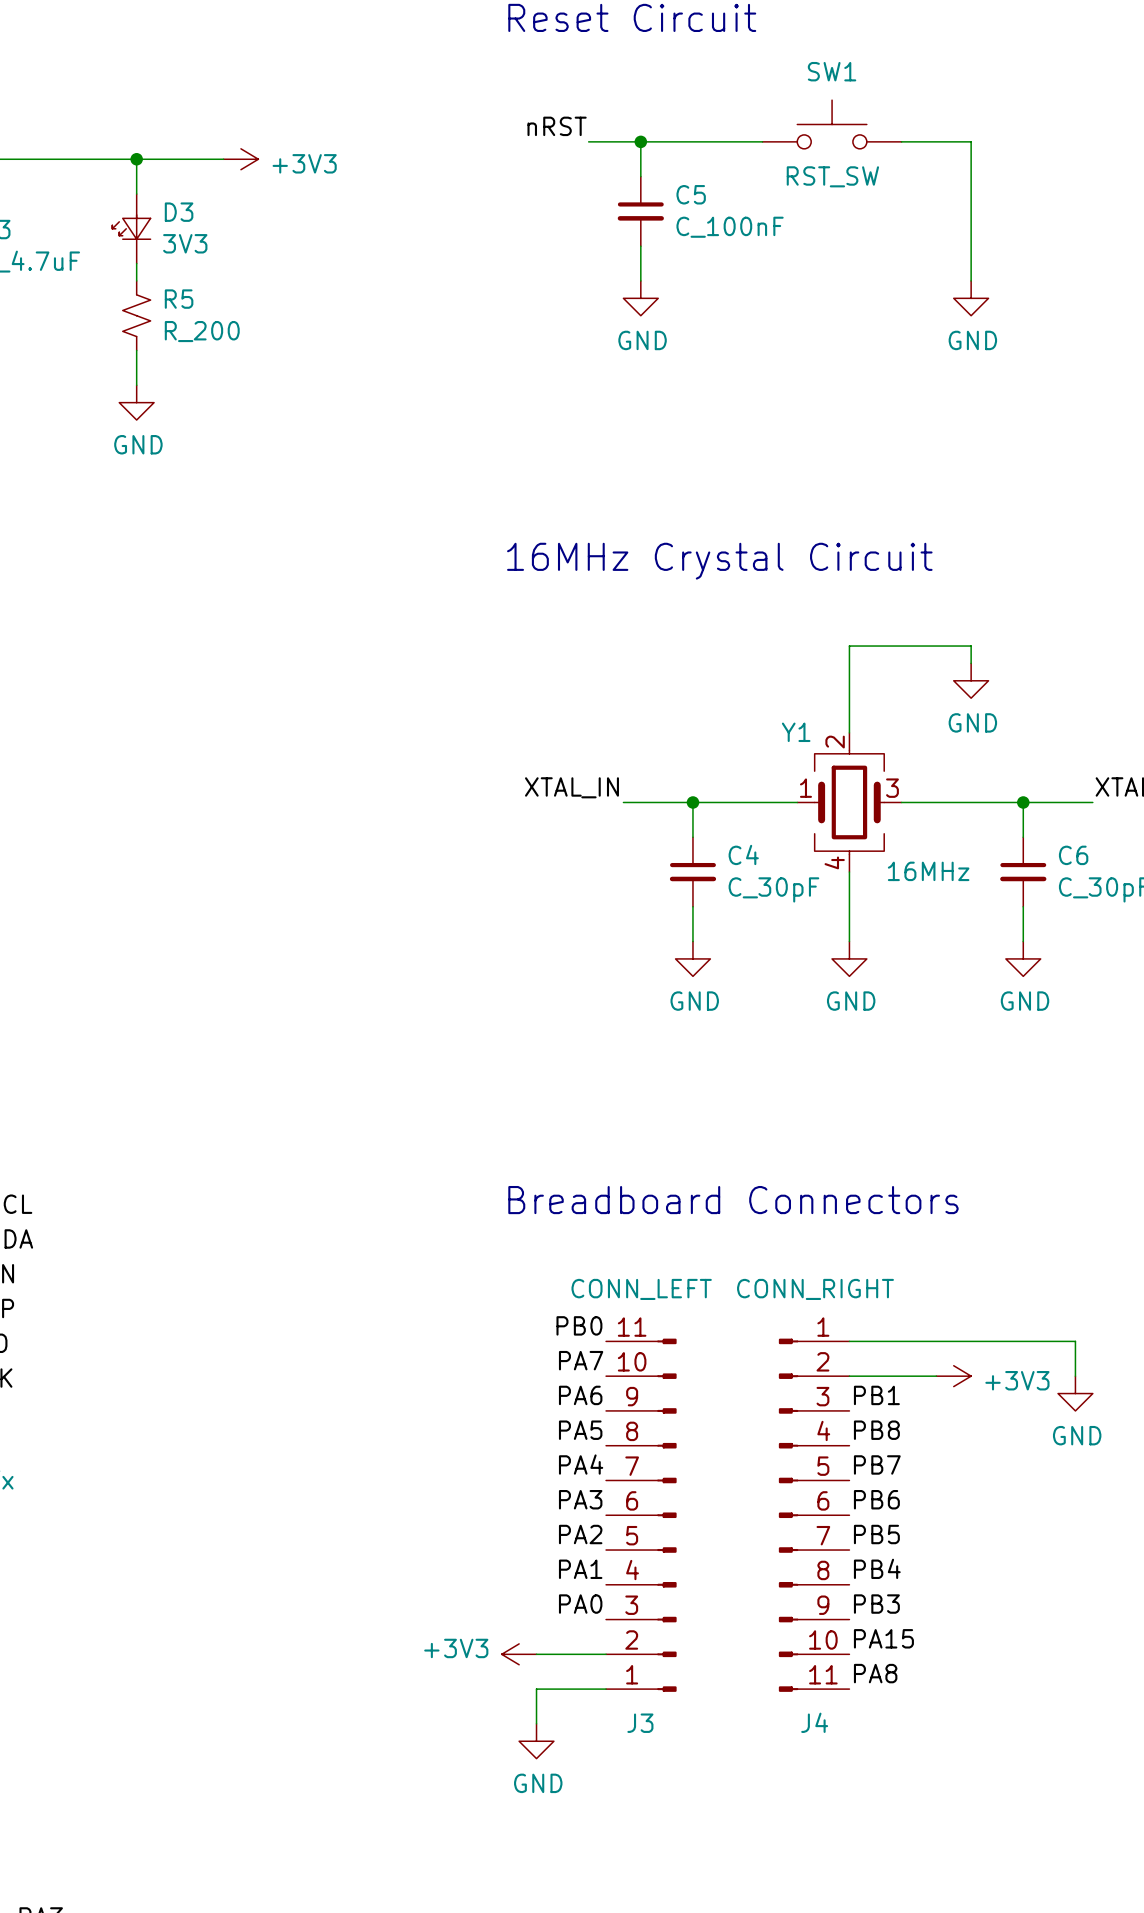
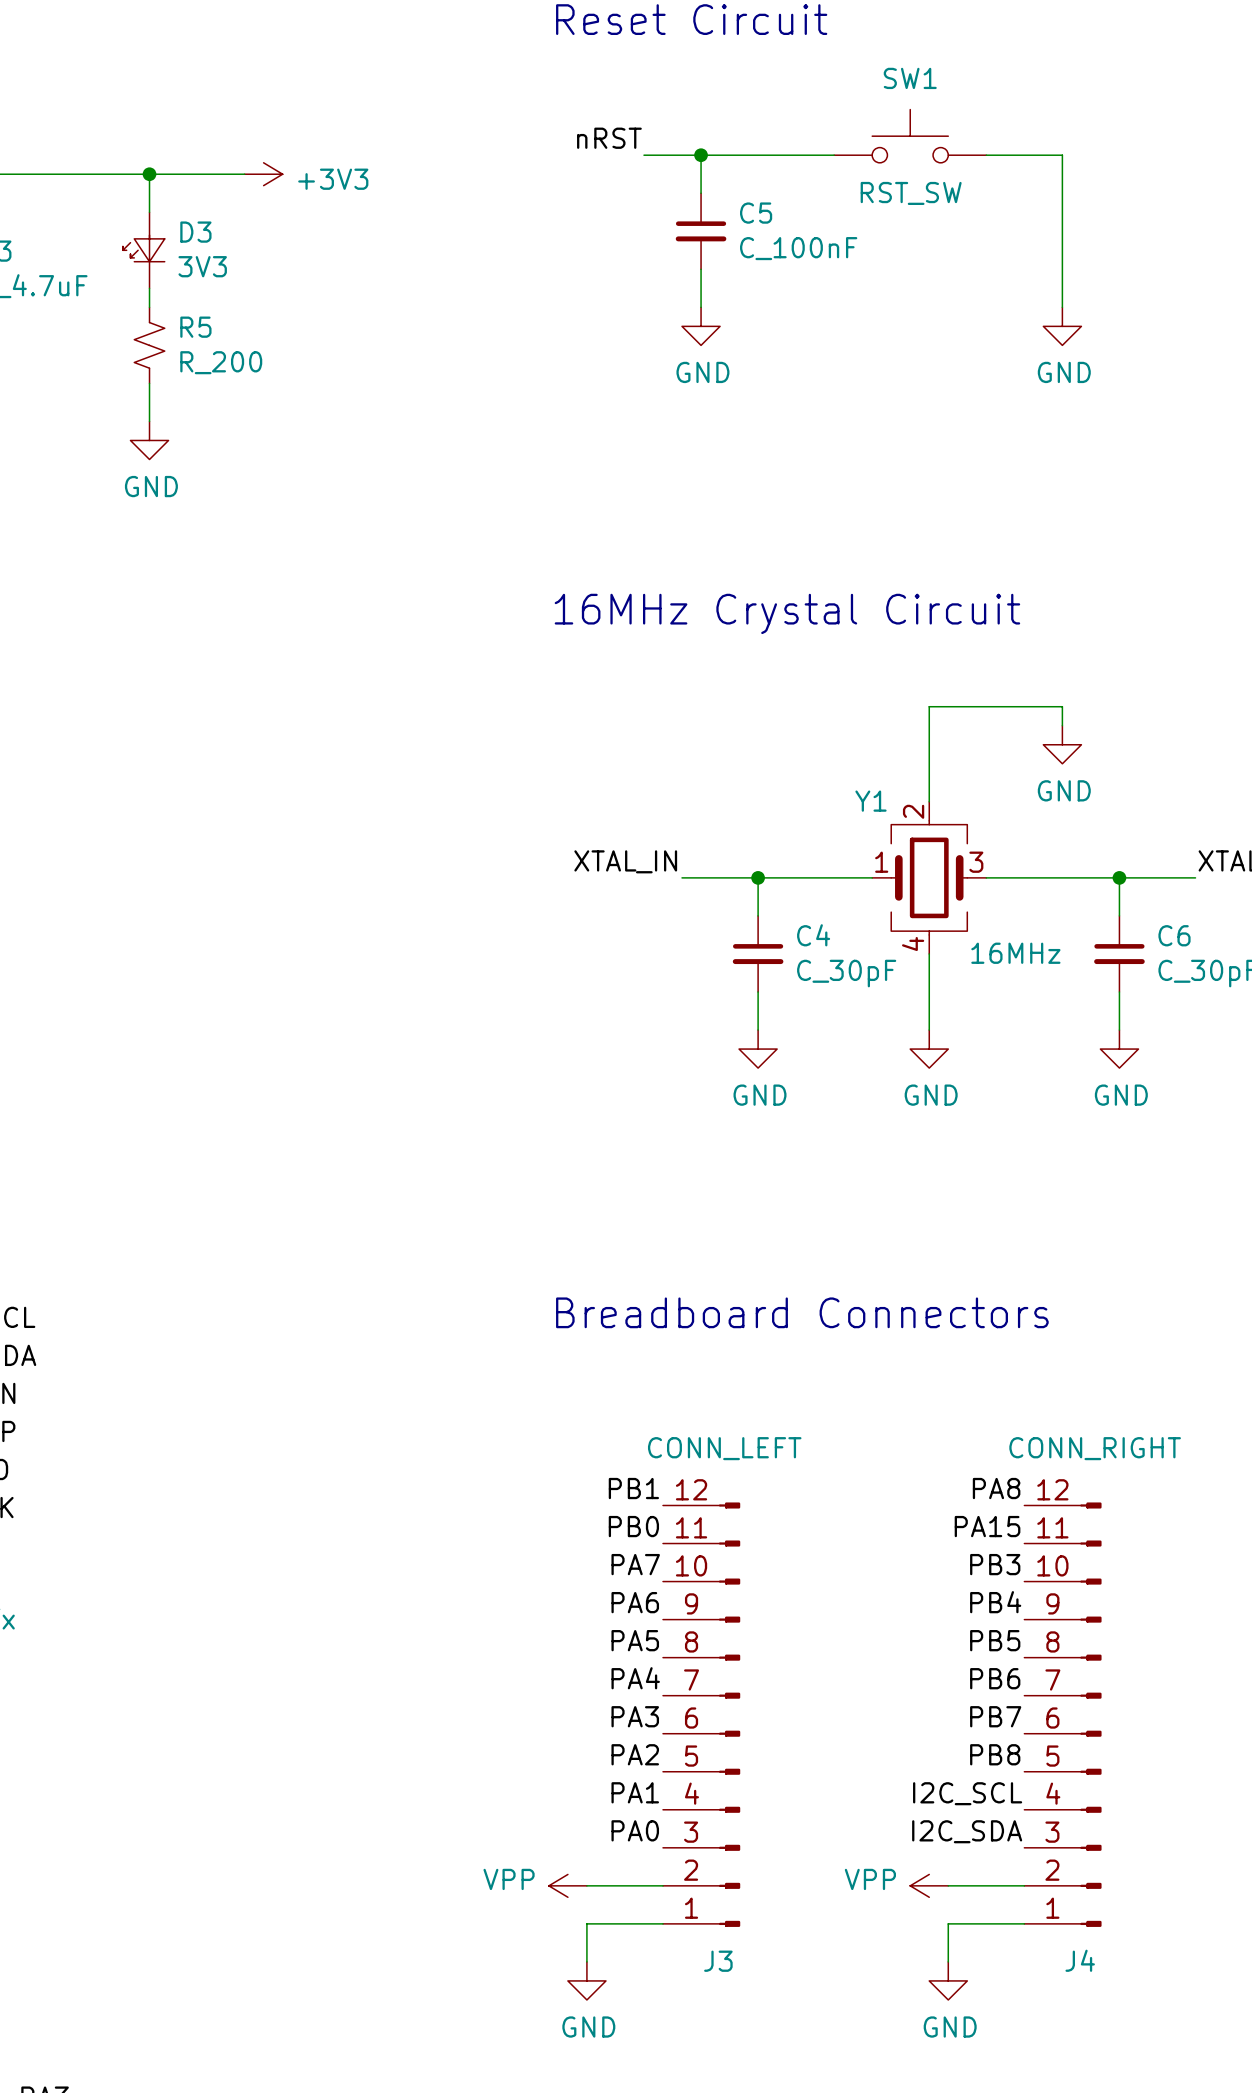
J3 value position: CONN_LEFT (641, 1289) -> CONN_LEFT (724, 1448)
J4 value position: CONN_RIGHT (815, 1289) -> CONN_RIGHT (1095, 1448)
label: PB0 (579, 1325) -> none
J3 symbol: [606, 1338, 677, 1692] -> [663, 1502, 741, 1927]
J4 symbol: [778, 1338, 850, 1692] -> [1024, 1502, 1102, 1927]
wire: (849, 1341) (1075, 1341) (1075, 1376) -> none
label: PA7 (581, 1360) -> PB1 (633, 1488)
wire: (849, 1376) (936, 1376) -> none
power symbol: +3V3 (953, 1376) -> none
power symbol: GND (1075, 1393) -> none
label: PA6 (580, 1395) -> PB0 (633, 1526)
label: PB1 (876, 1395) -> none
label: PA5 (580, 1430) -> PA7 (635, 1564)
label position: PB8 (876, 1430) -> PB8 (995, 1754)
label: PA4 (581, 1464) -> PA6 (635, 1602)
label position: PB7 (877, 1464) -> PB7 (995, 1716)
label: PA3 (580, 1499) -> PA5 (635, 1640)
label position: PB6 (876, 1499) -> PB6 (995, 1678)
label: PA2 (580, 1534) -> PA4 (635, 1678)
label position: PB5 (876, 1534) -> PB5 (995, 1640)
label position: PB4 (877, 1568) -> PB4 (995, 1602)
label: PA1 (580, 1569) -> PA3 (635, 1716)
label: PA0 (580, 1604) -> PA2 (635, 1754)
label position: PB3 (876, 1604) -> PB3 (995, 1564)
label: none -> PA1 (635, 1792)
label position: PA15 (883, 1638) -> PA15 (987, 1526)
label: none -> I2C_SCL (967, 1793)
power symbol: +3V3 (519, 1654) -> none
wire: (536, 1654) (606, 1654) -> (948, 1885) (1024, 1885)
label: none -> PA0 (635, 1830)
label position: PA8 (875, 1673) -> PA8 (996, 1488)
label: none -> I2C_SDA (967, 1831)
wire: (606, 1689) (536, 1689) (536, 1723) -> (663, 1885) (586, 1885)
power symbol: none -> VPP (567, 1885)
power symbol: none -> VPP (929, 1885)
power symbol position: GND (536, 1741) -> GND (586, 1980)
wire: none -> (663, 1923) (586, 1923) (586, 1961)
wire: none -> (1024, 1923) (948, 1923) (948, 1961)
power symbol: none -> GND (948, 1980)

